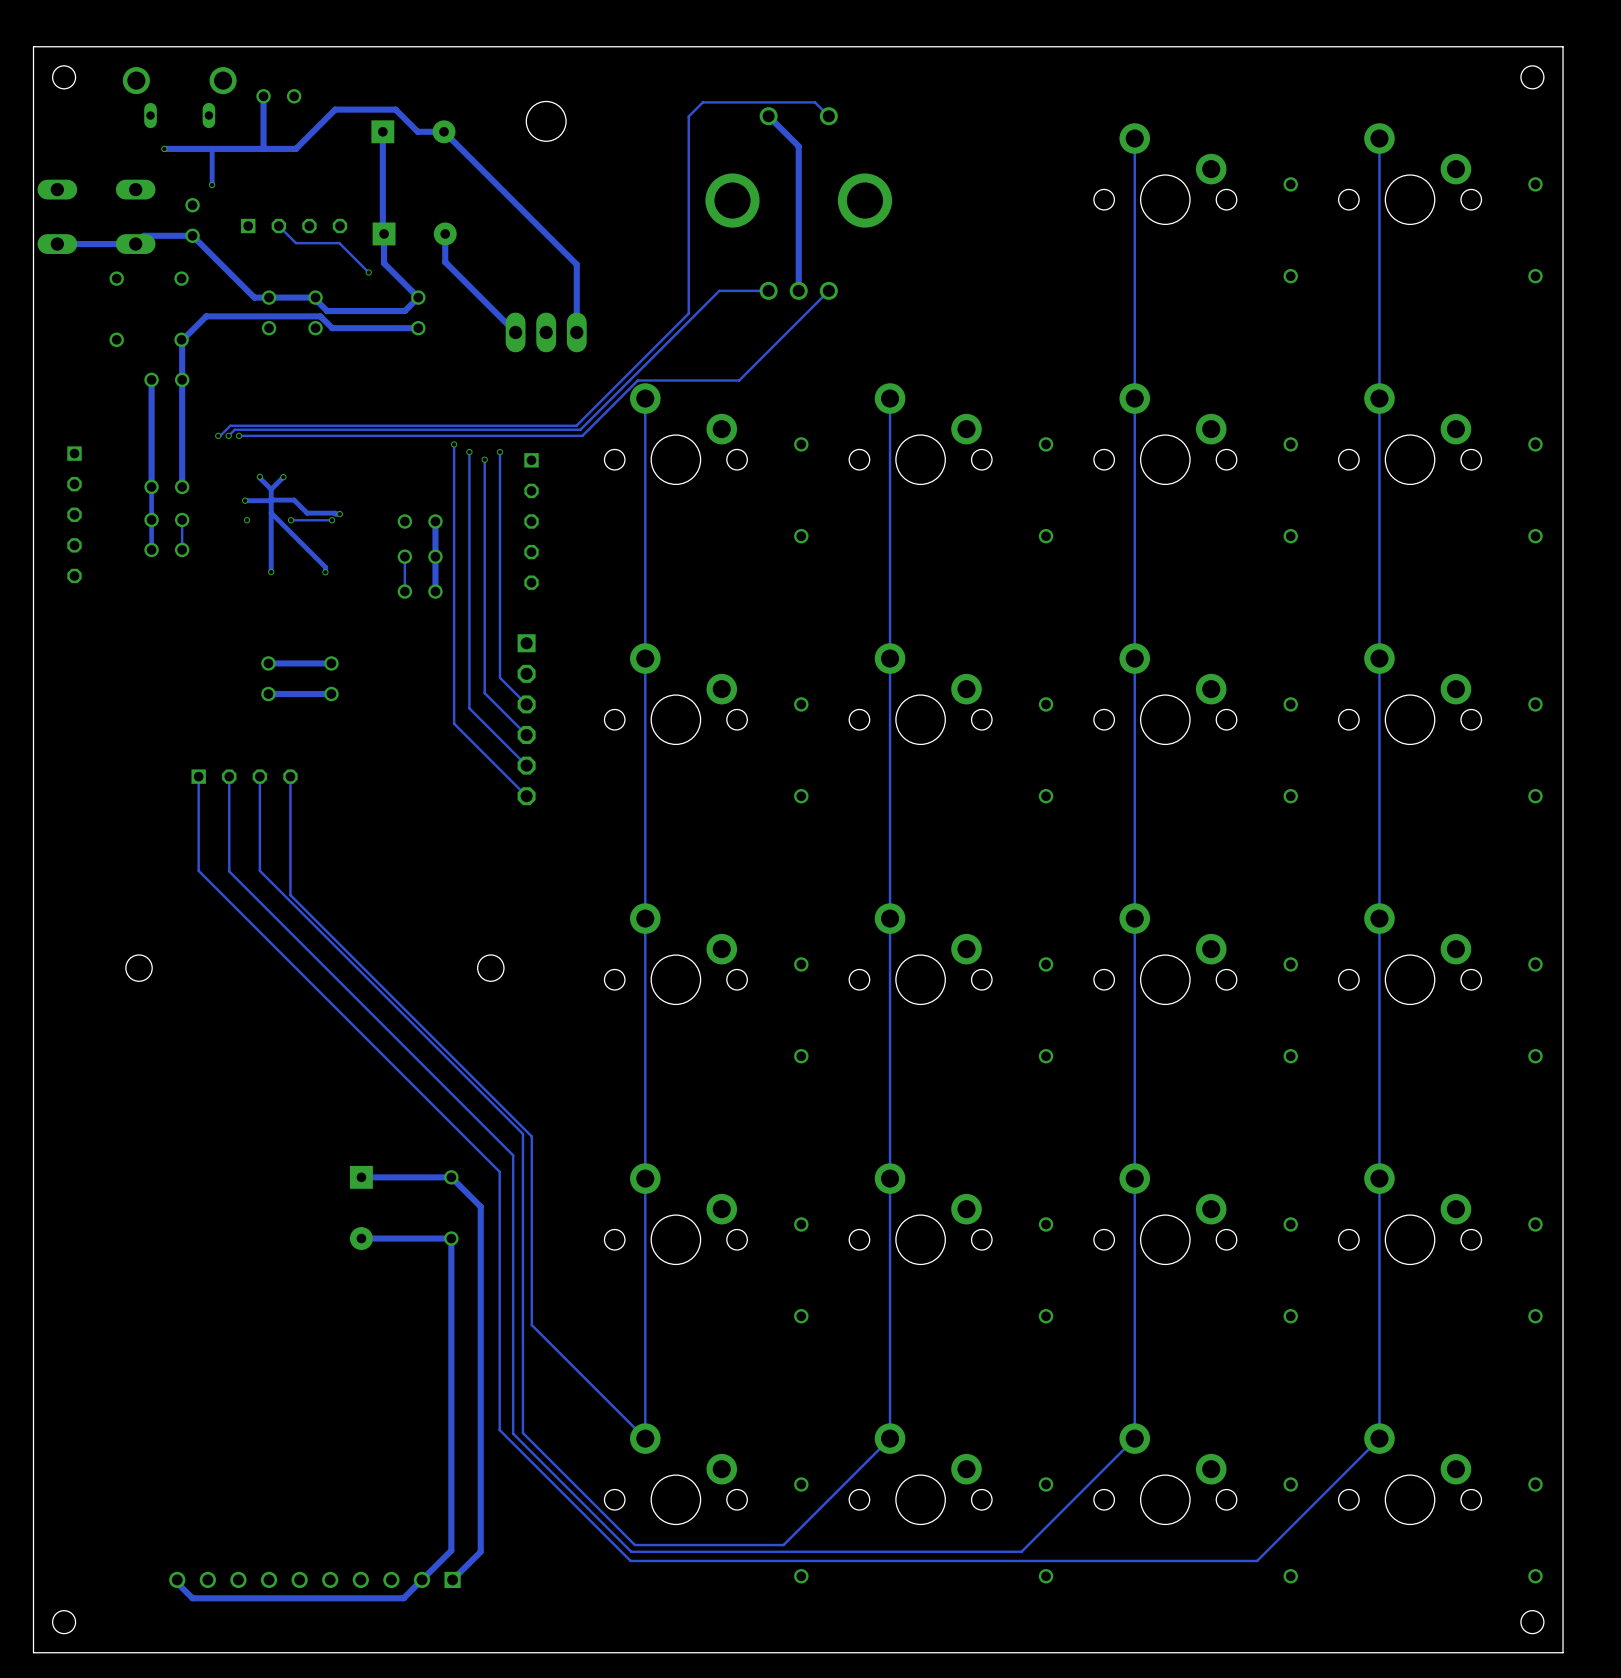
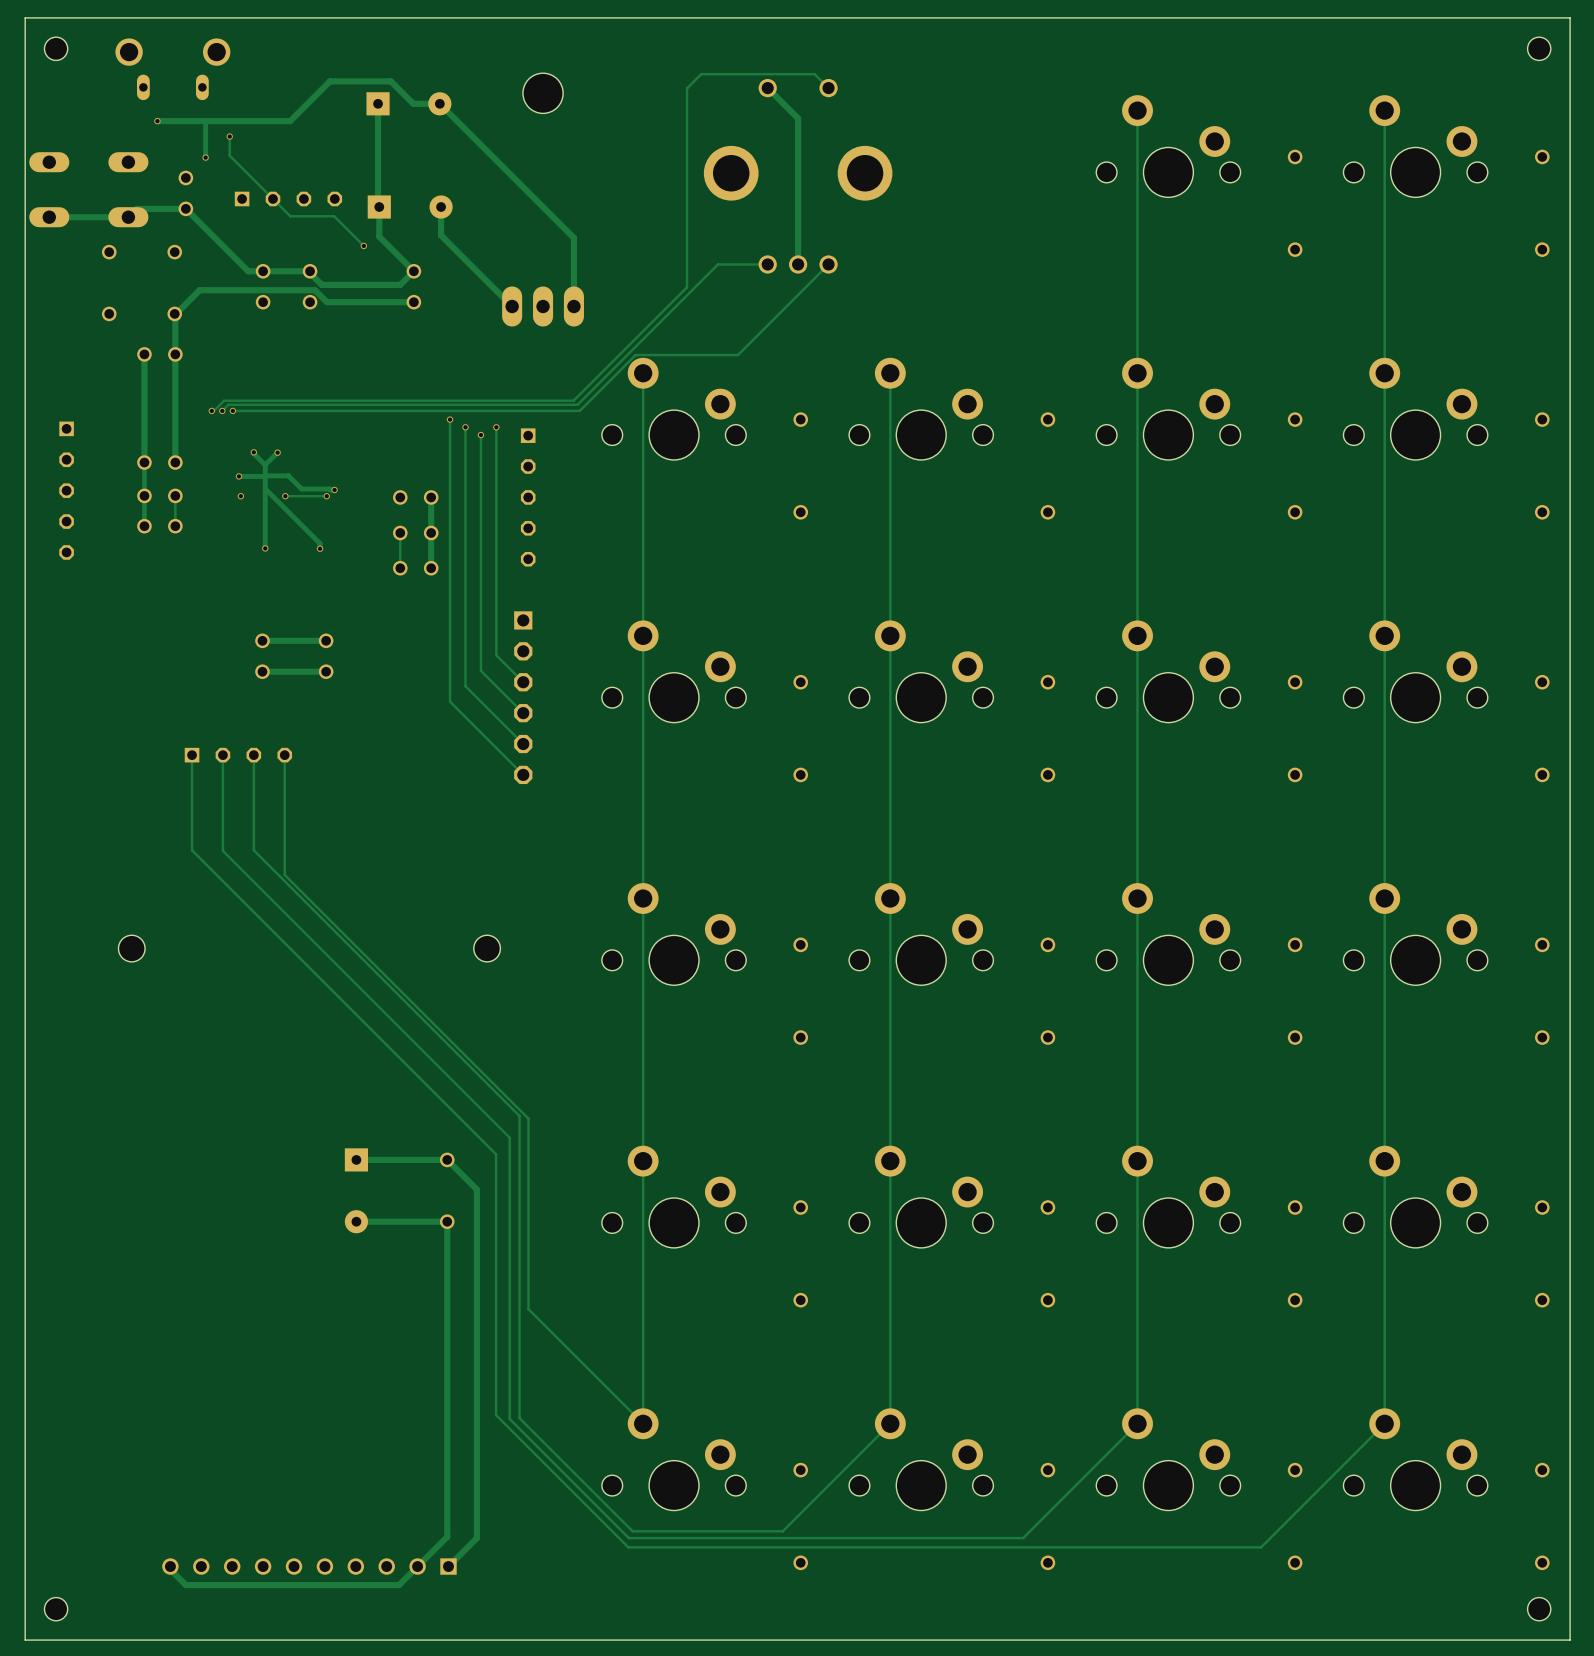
track: (263, 96) (264, 148) -> none
part: (278, 96) -> none
track: none -> (229, 136) (229, 155) (272, 198)
via: none -> (229, 136)

